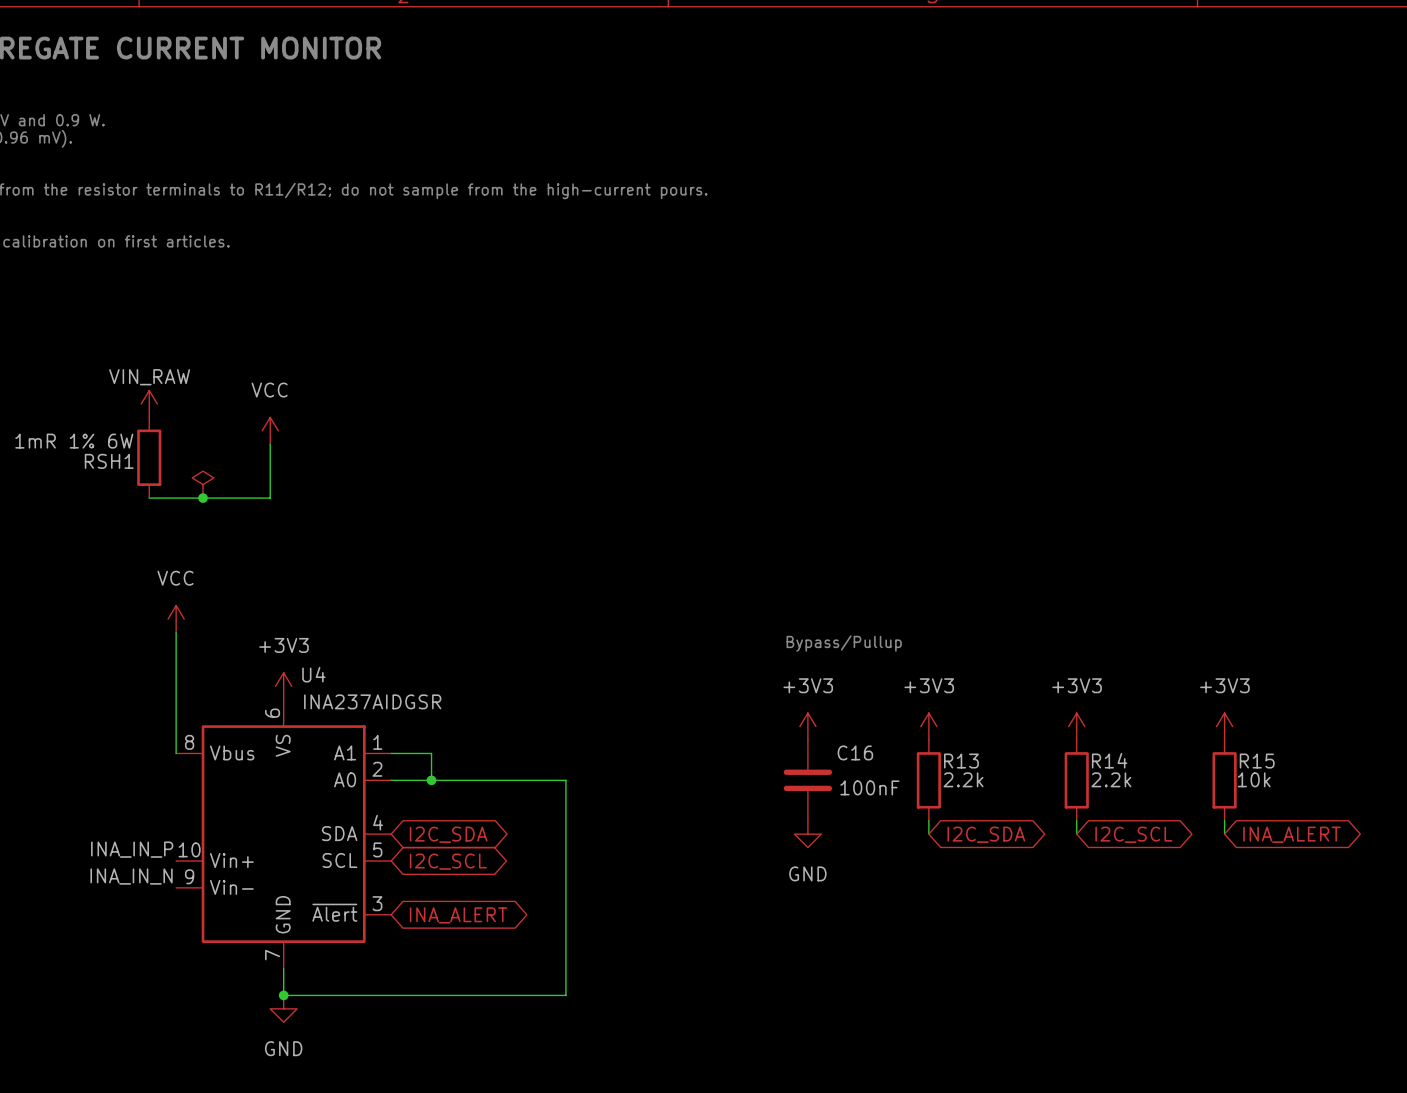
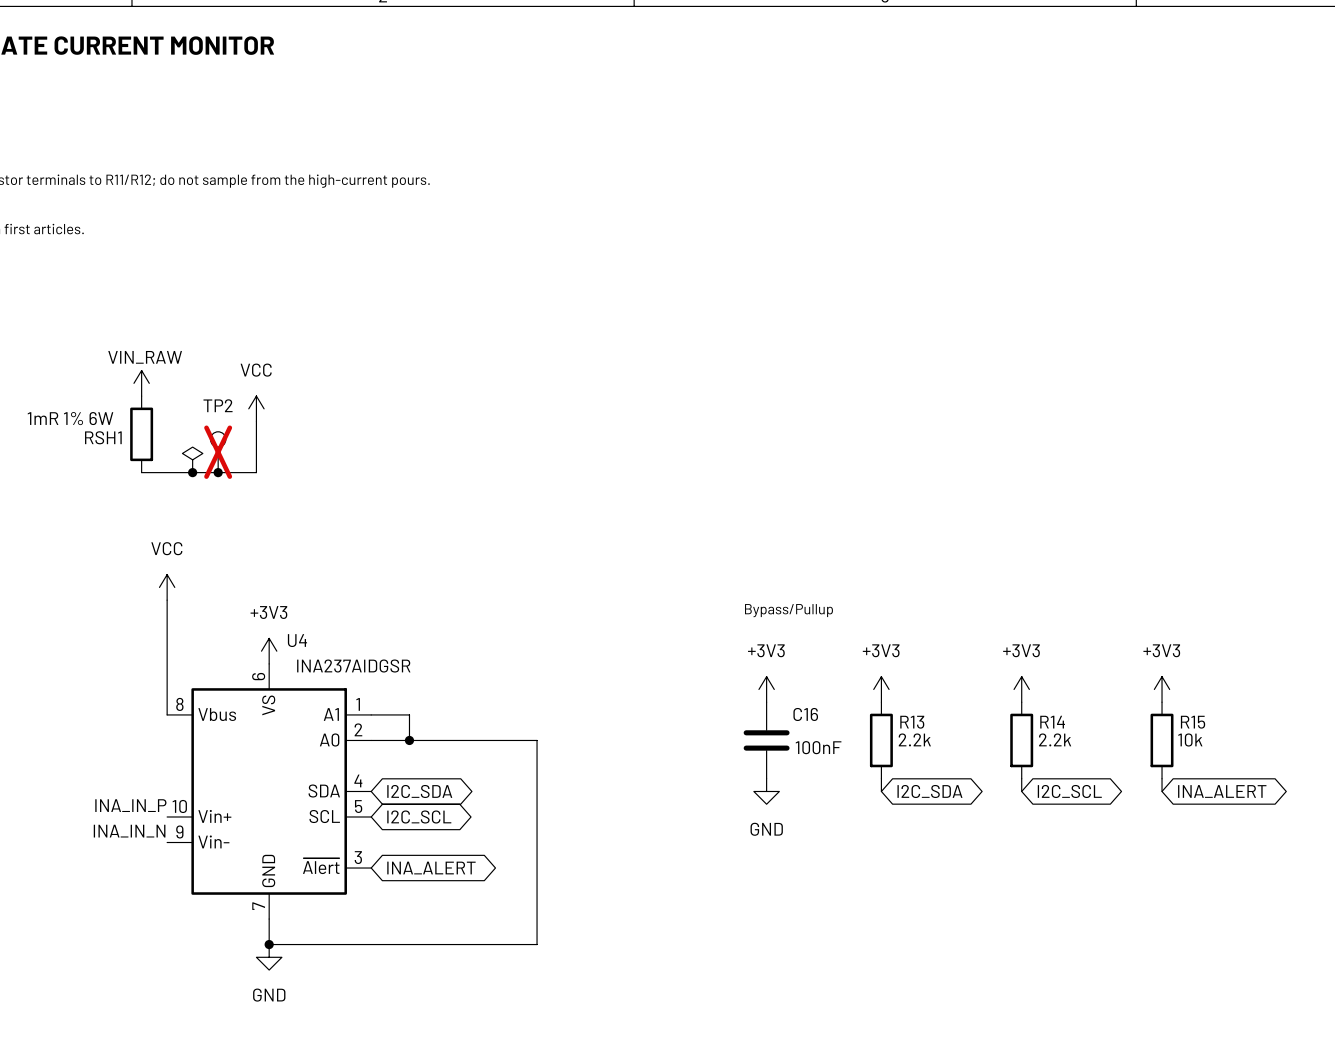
TP2: none -> (218, 452)
junction: none -> (218, 472)

